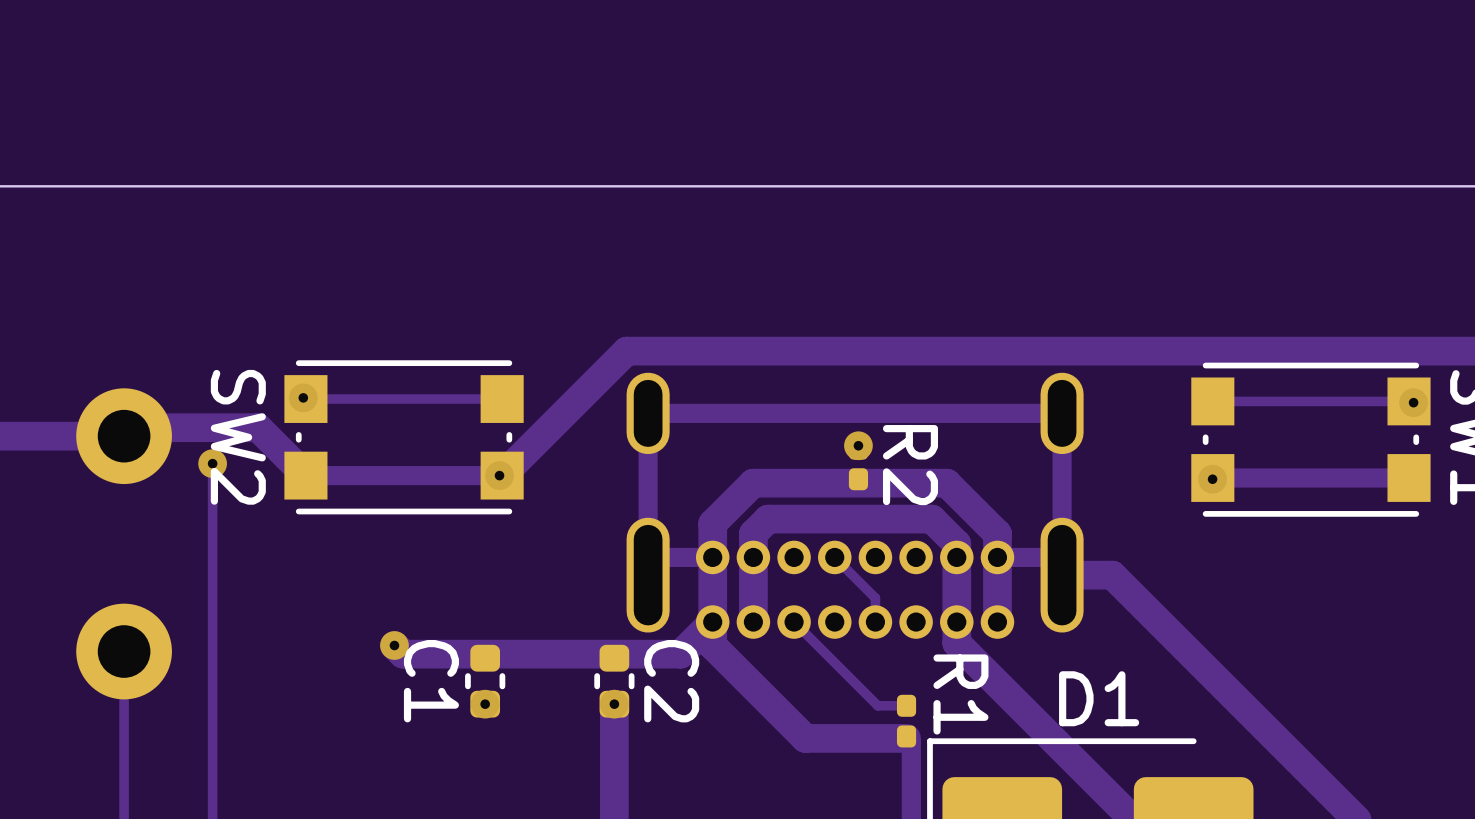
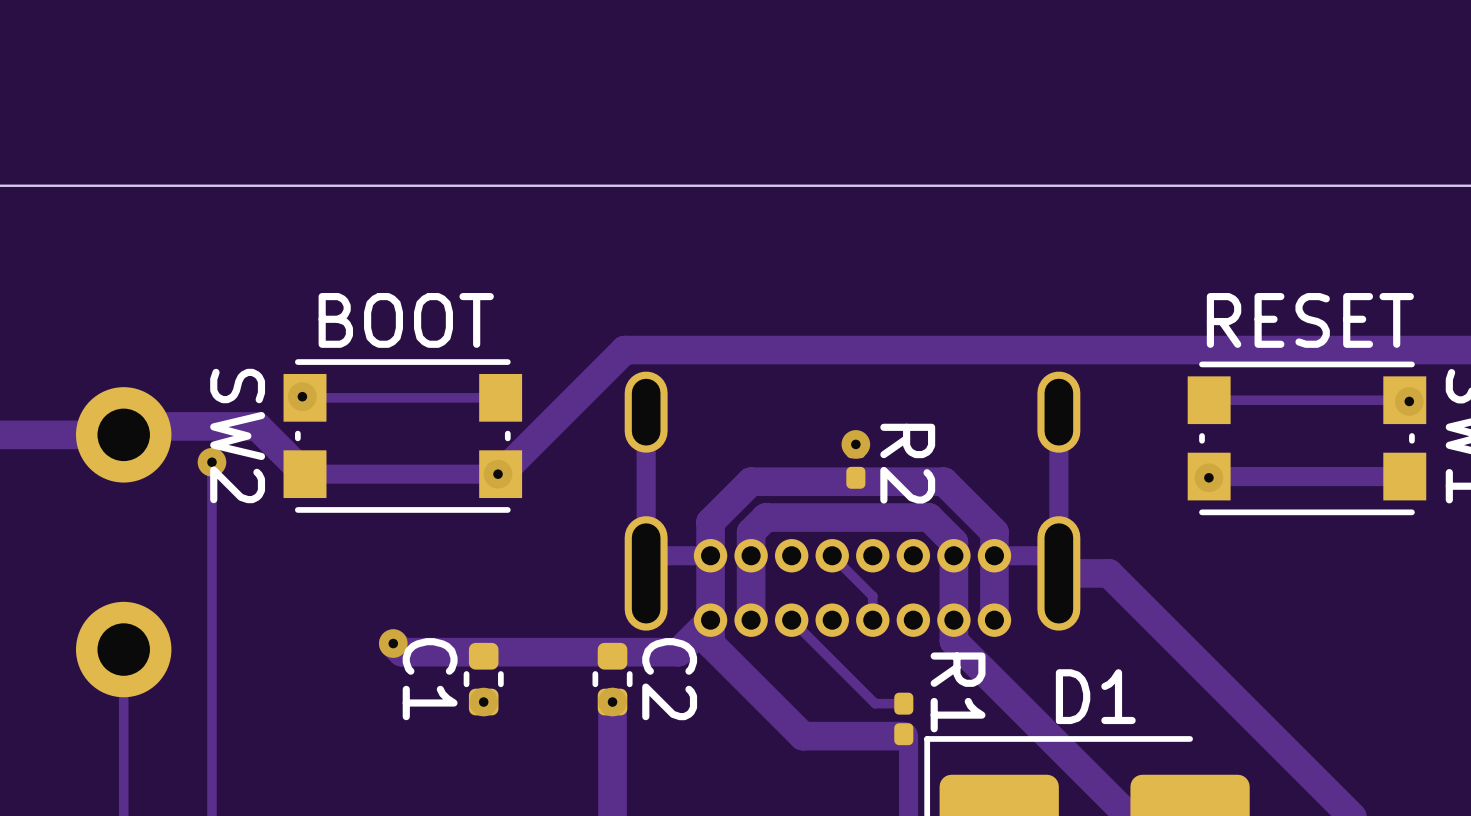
text: none -> BOOT (406, 320)
text: none -> RESET (1310, 320)
track: (1062, 413) (648, 413) -> none

